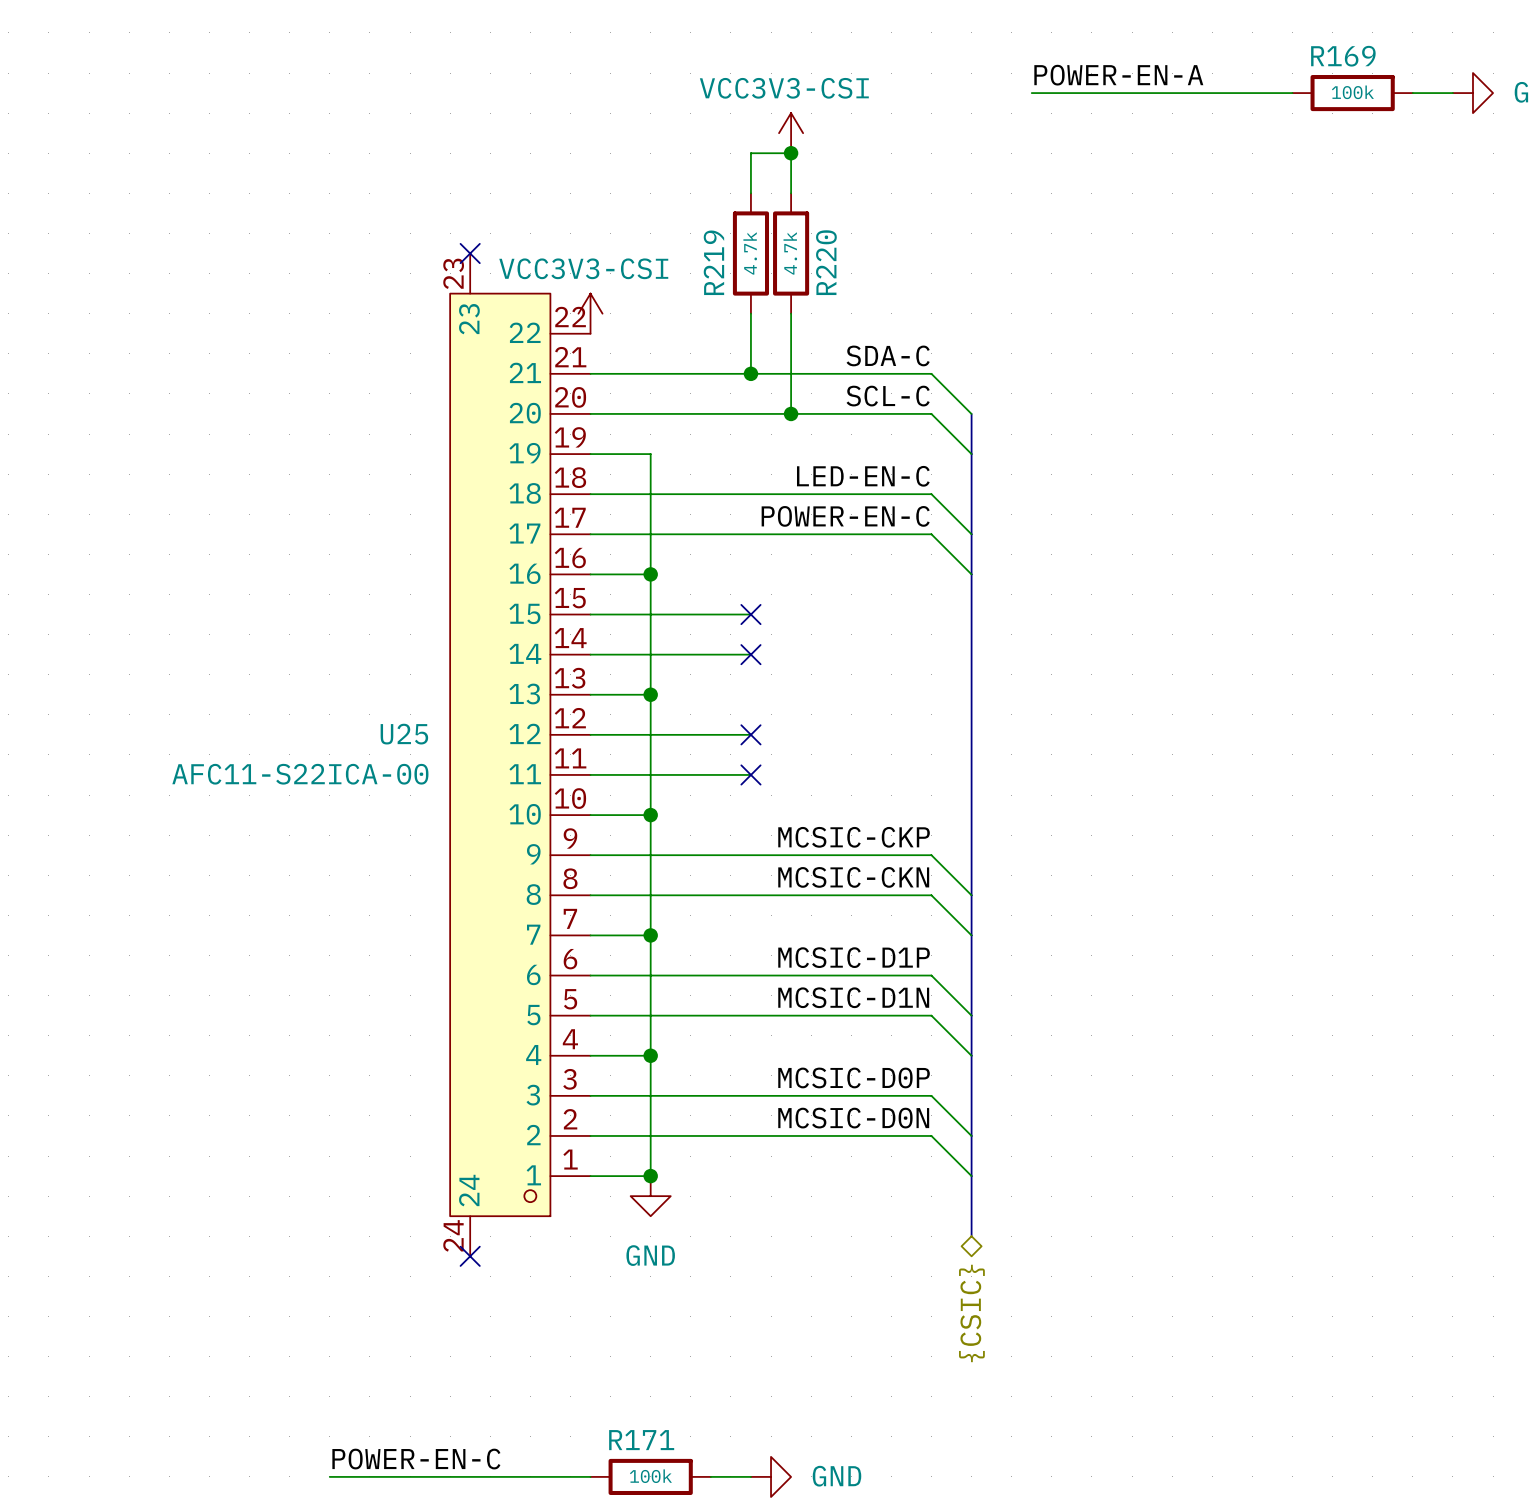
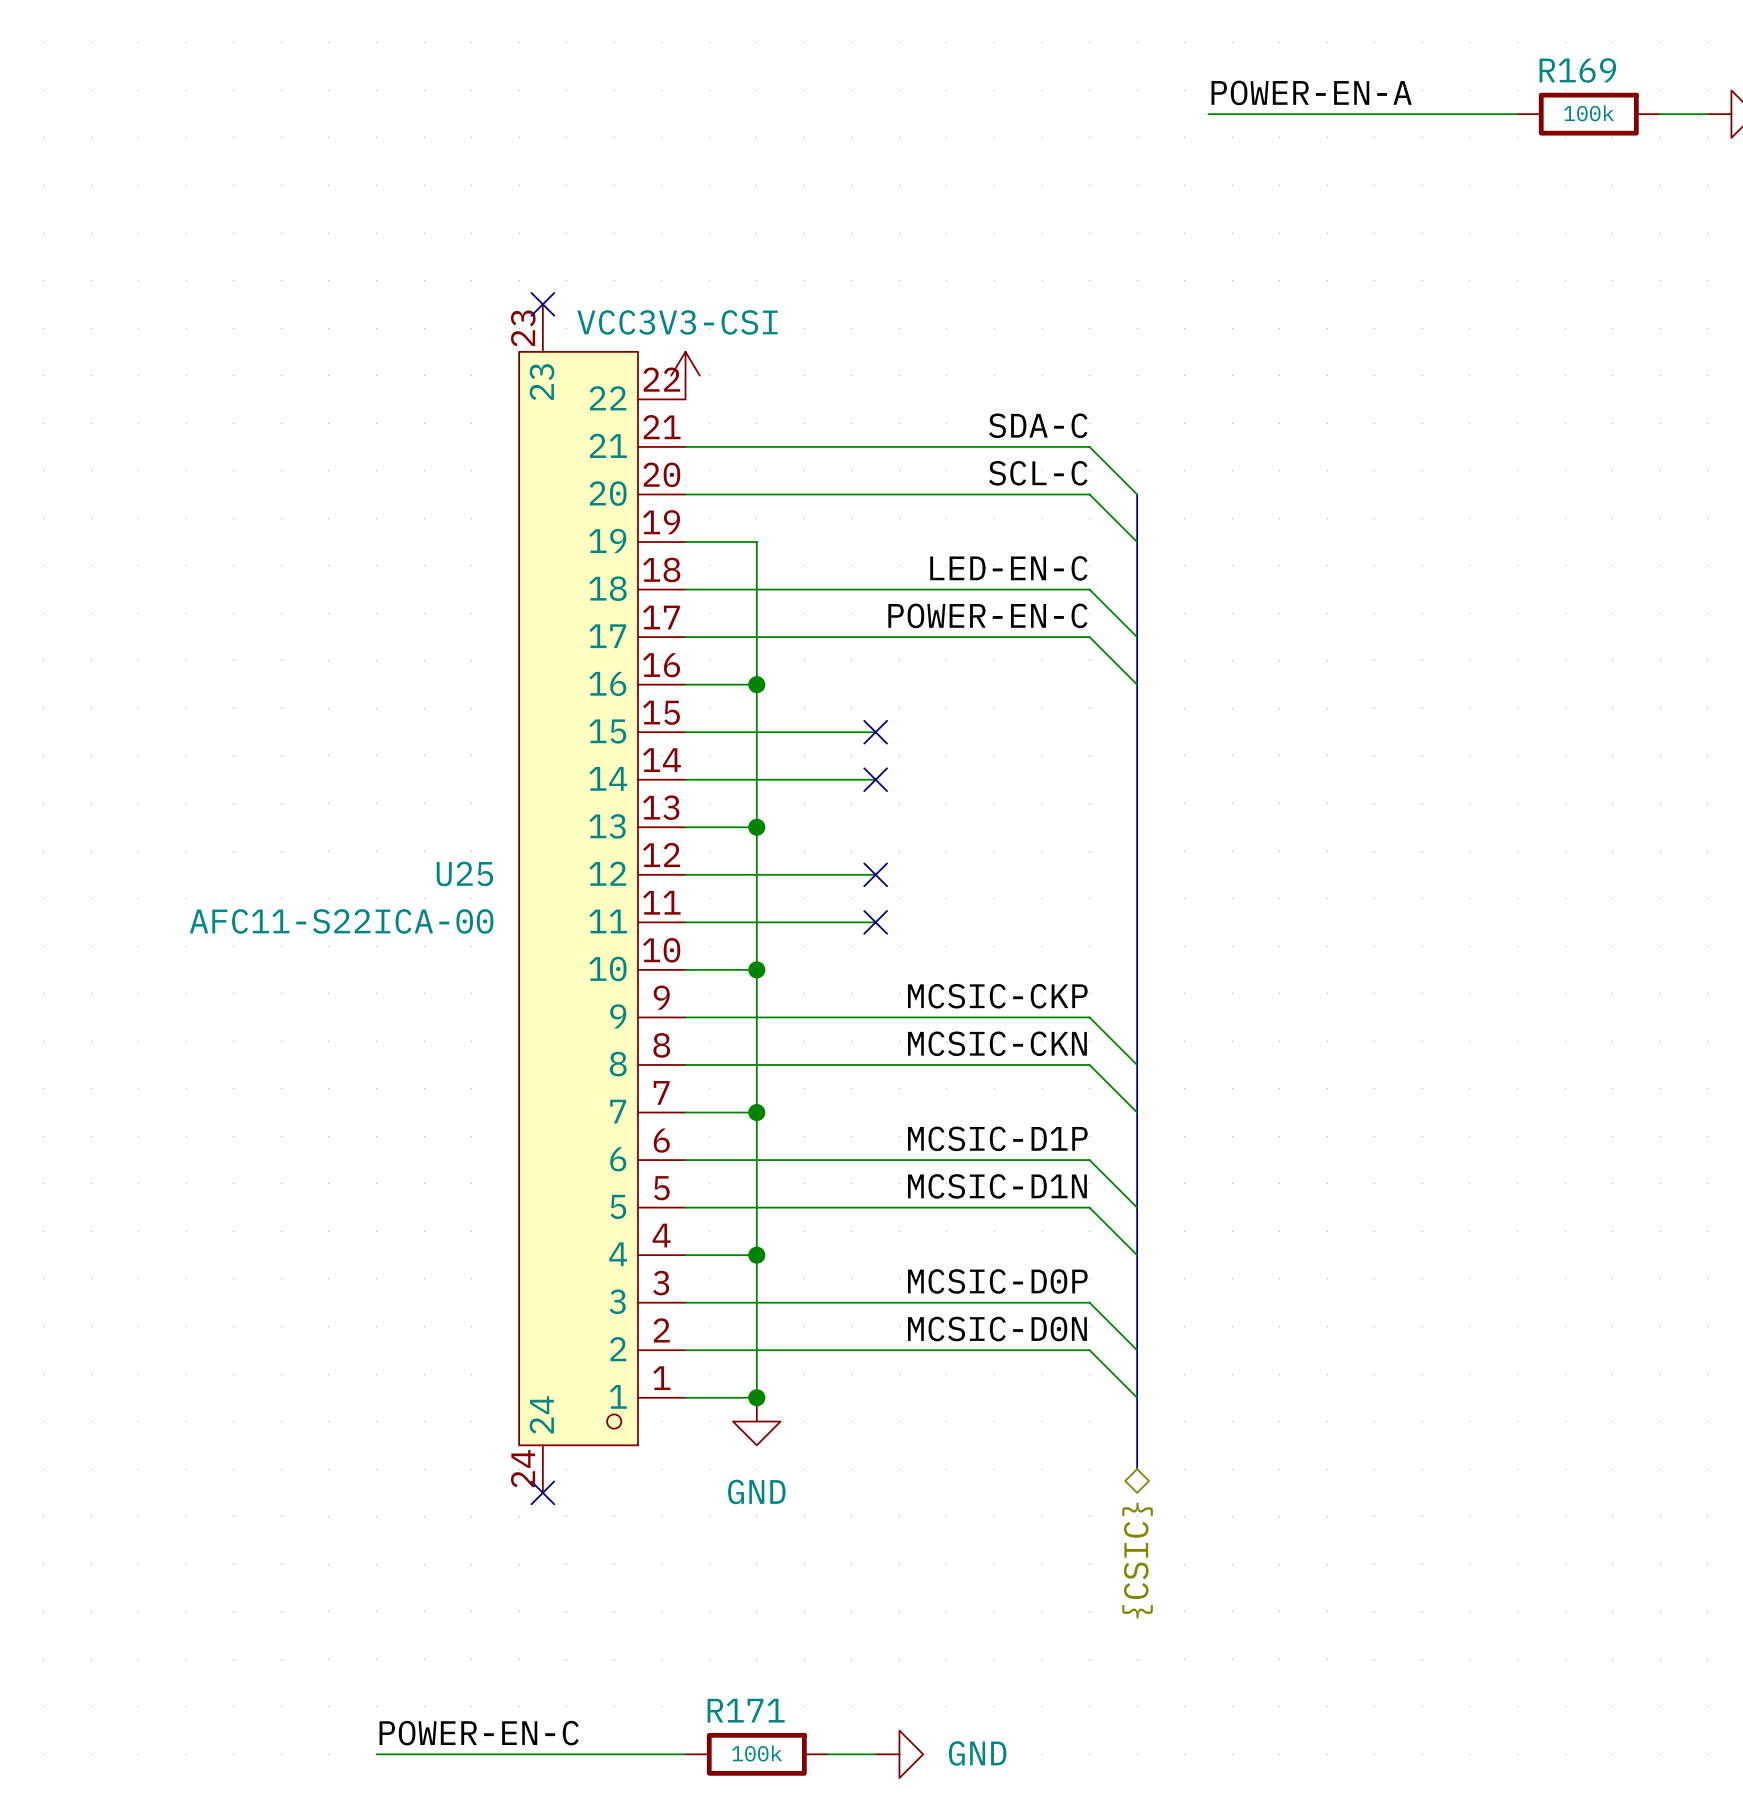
power symbol: VCC3V3-CSI (791, 133) -> none
junction: (791, 153) -> none
wire: (750, 193) (750, 153) (791, 153) (791, 193) -> none
R219: 4.7k (750, 253) -> none
R220: 4.7k (791, 253) -> none
wire: (750, 313) (750, 373) -> none
wire: (791, 313) (791, 413) -> none
junction: (750, 373) -> none
junction: (791, 413) -> none

